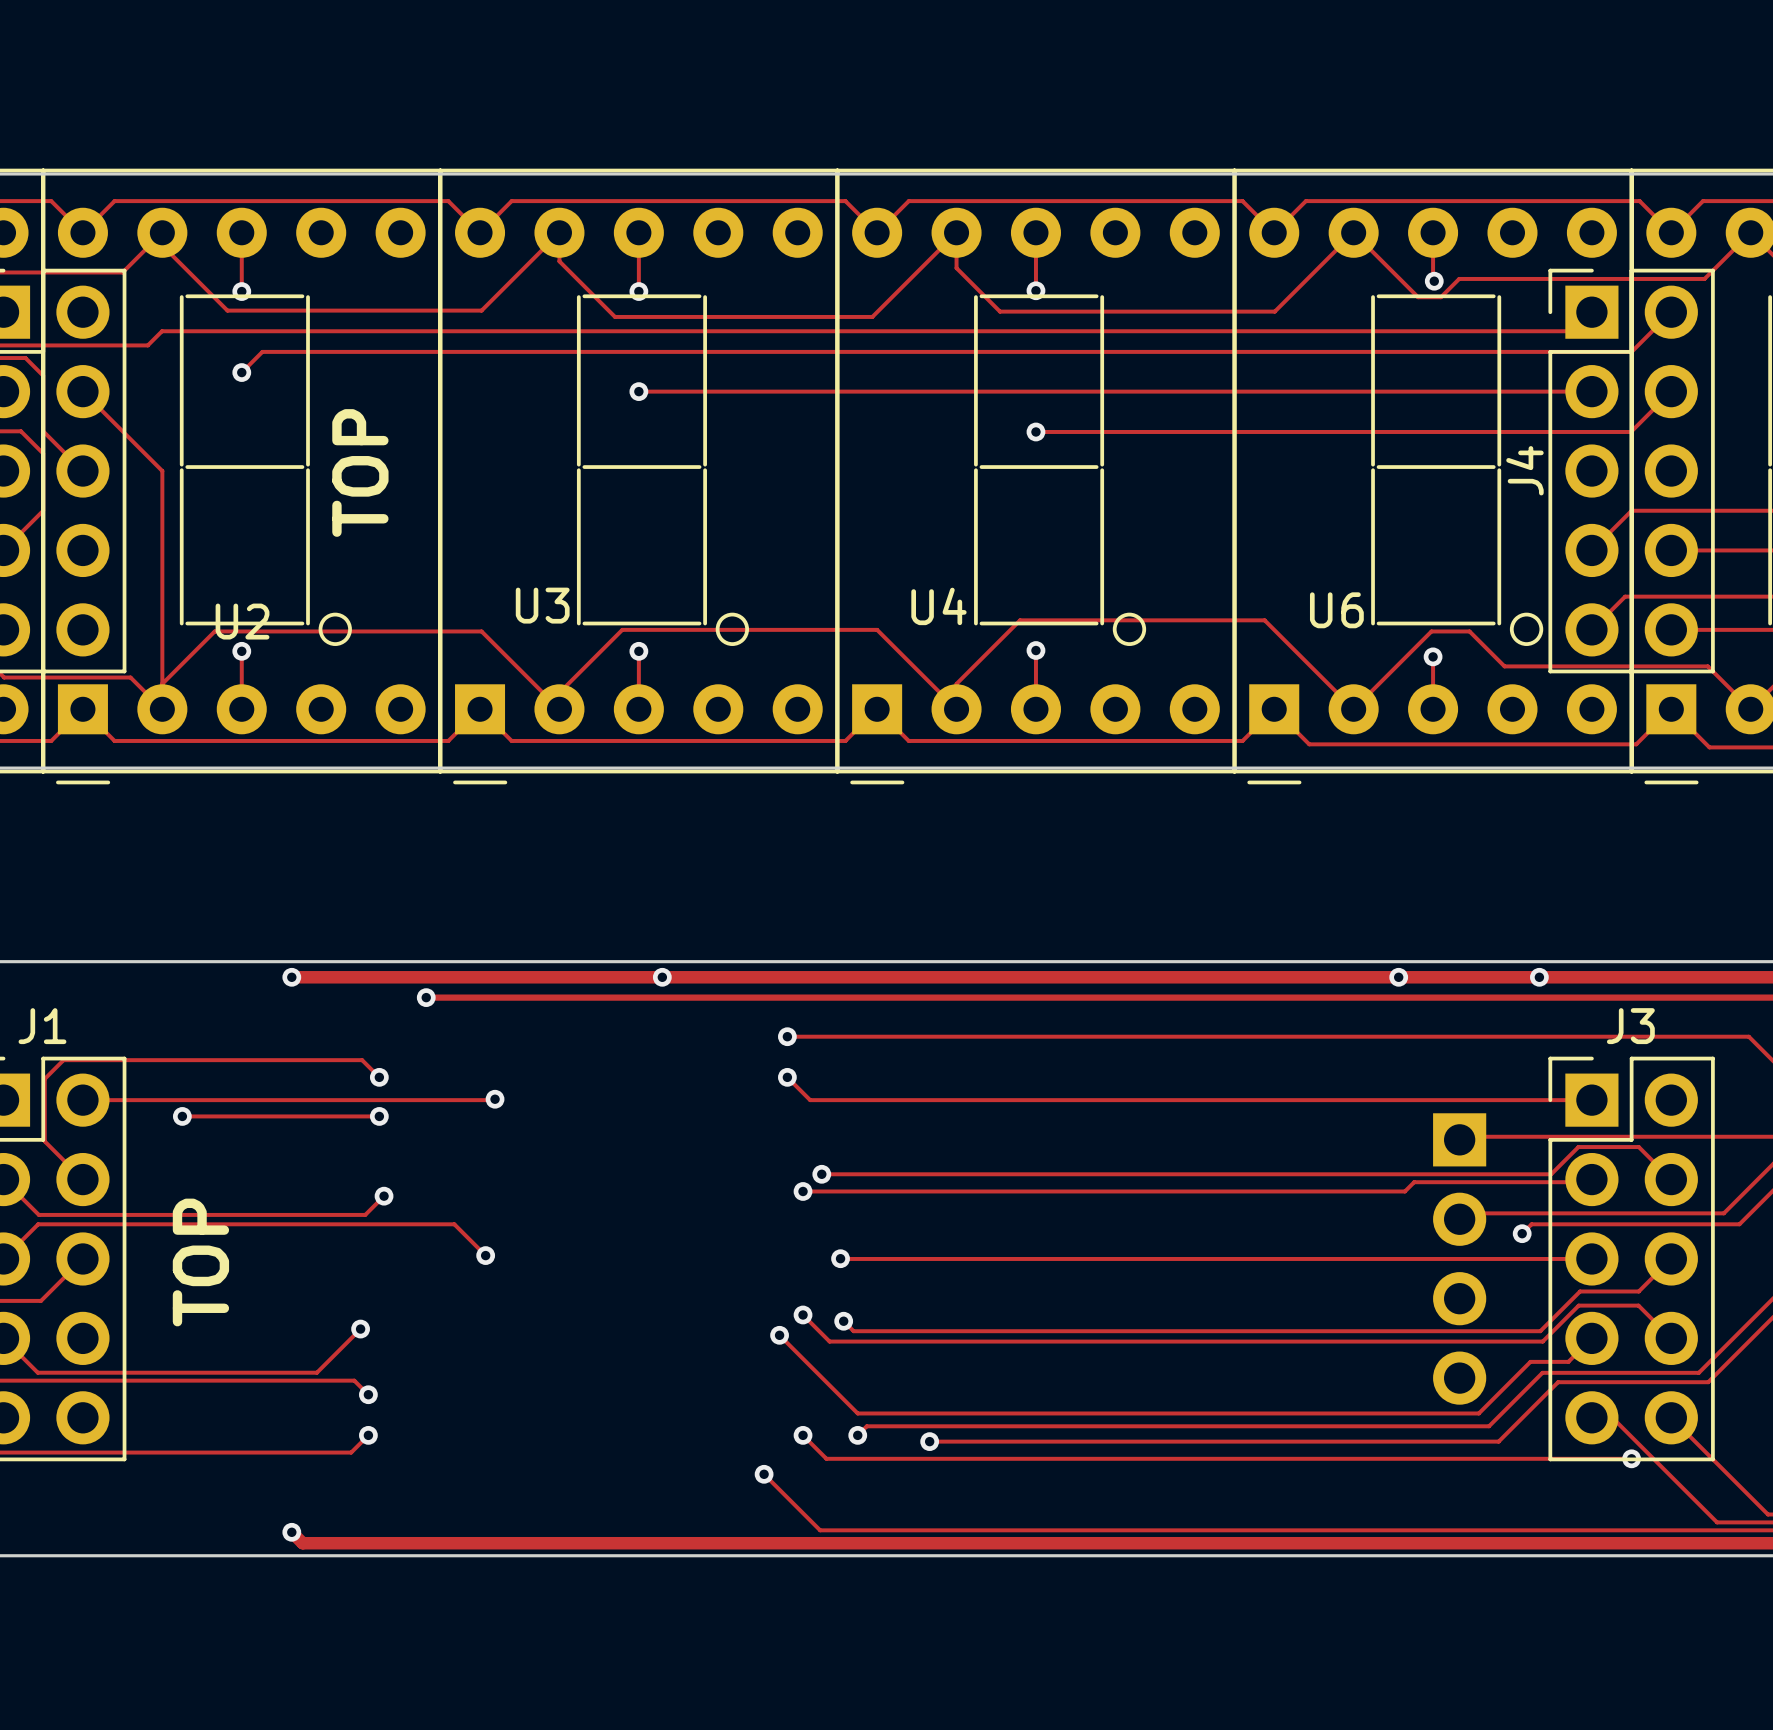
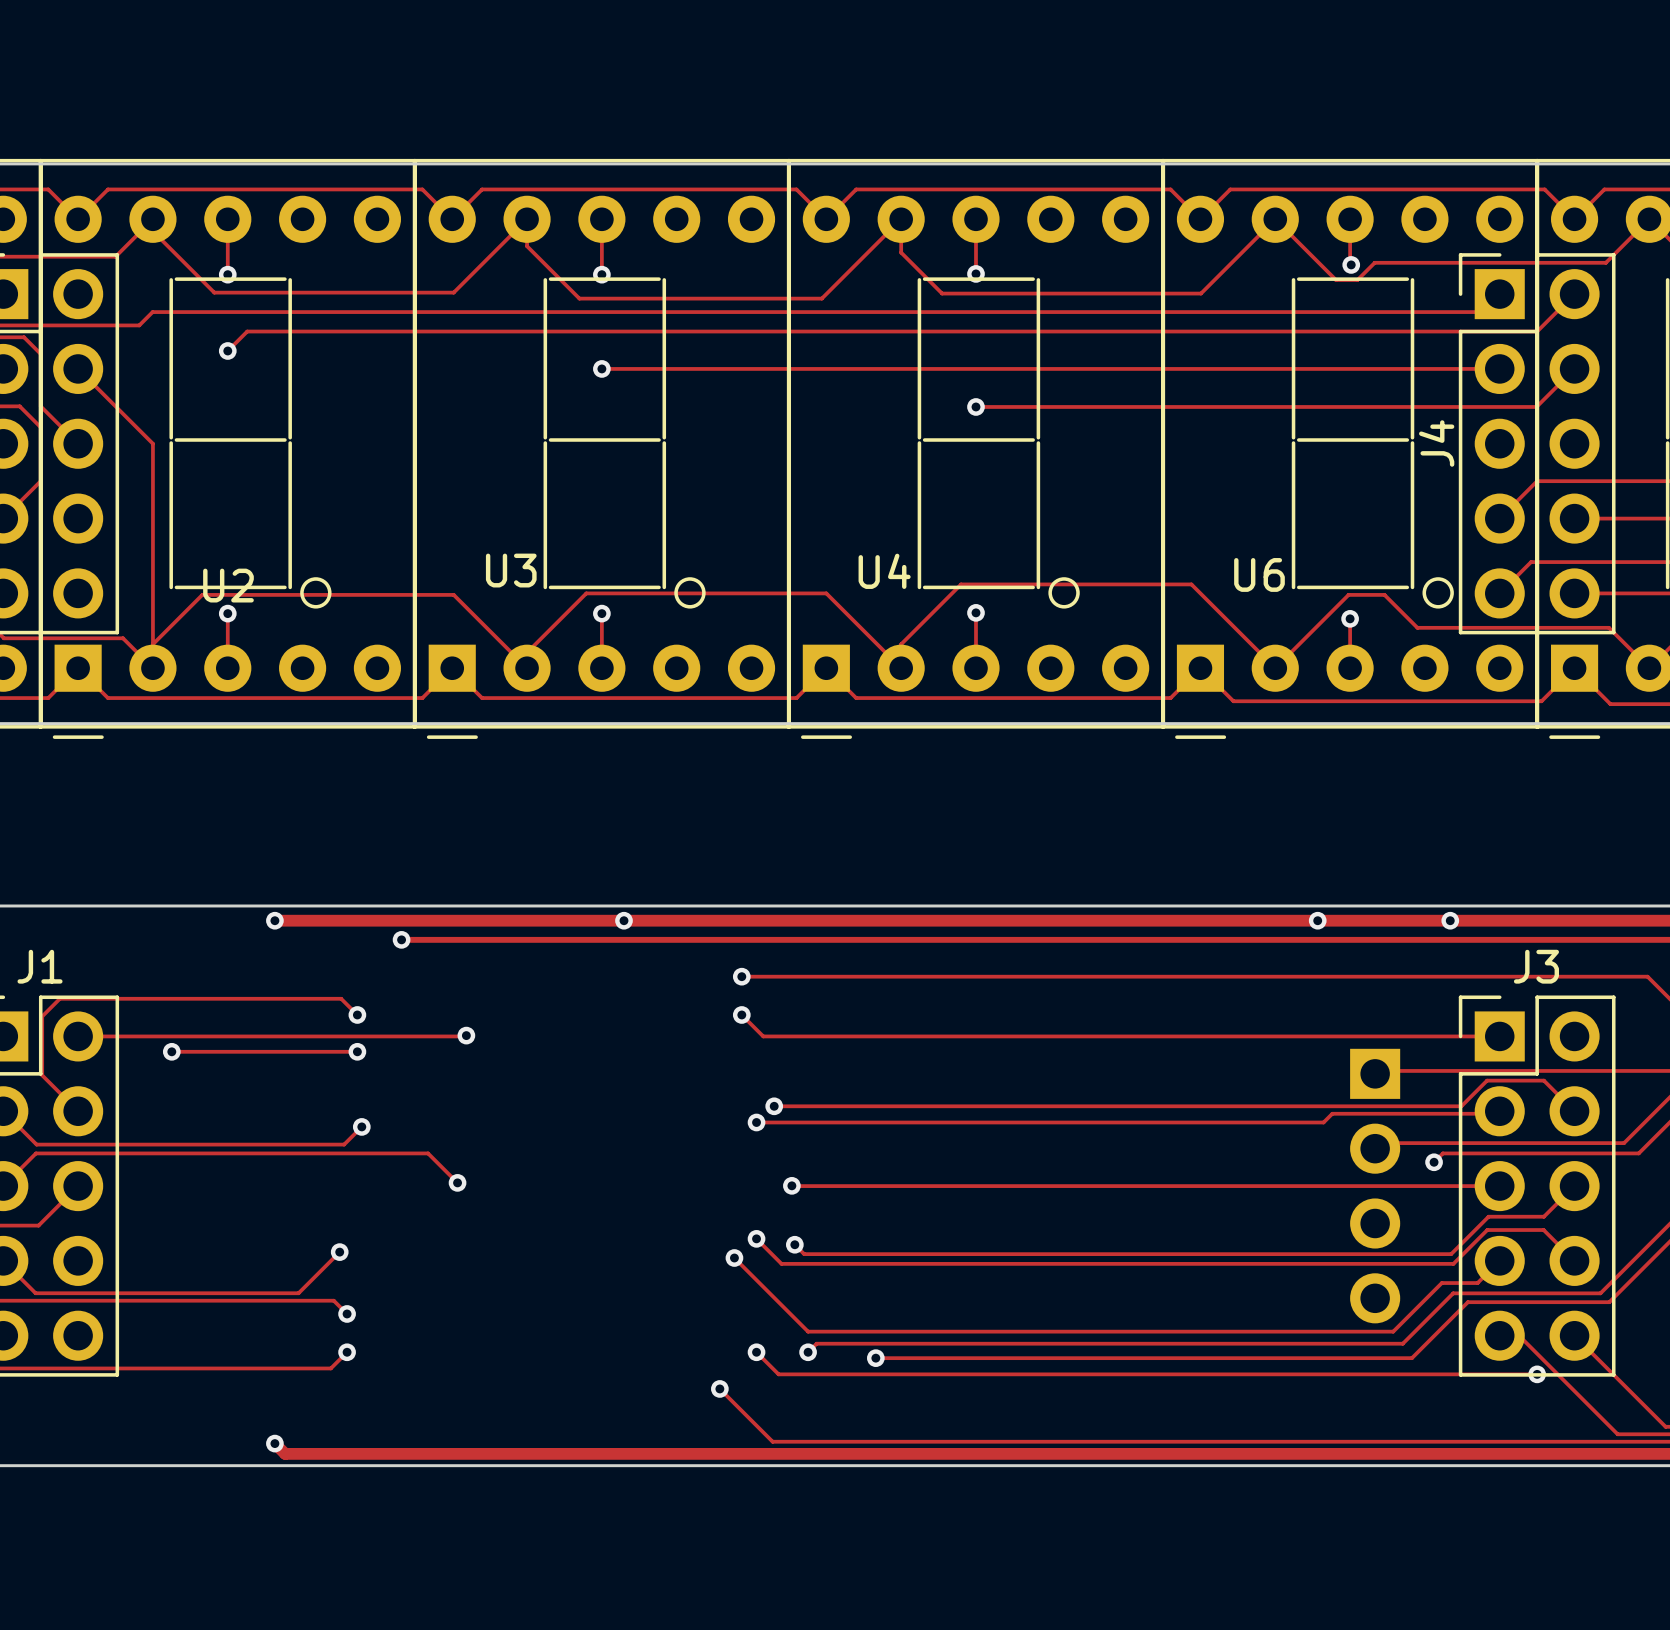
text: TOP (360, 472) -> none
text: TOP (200, 1262) -> none

